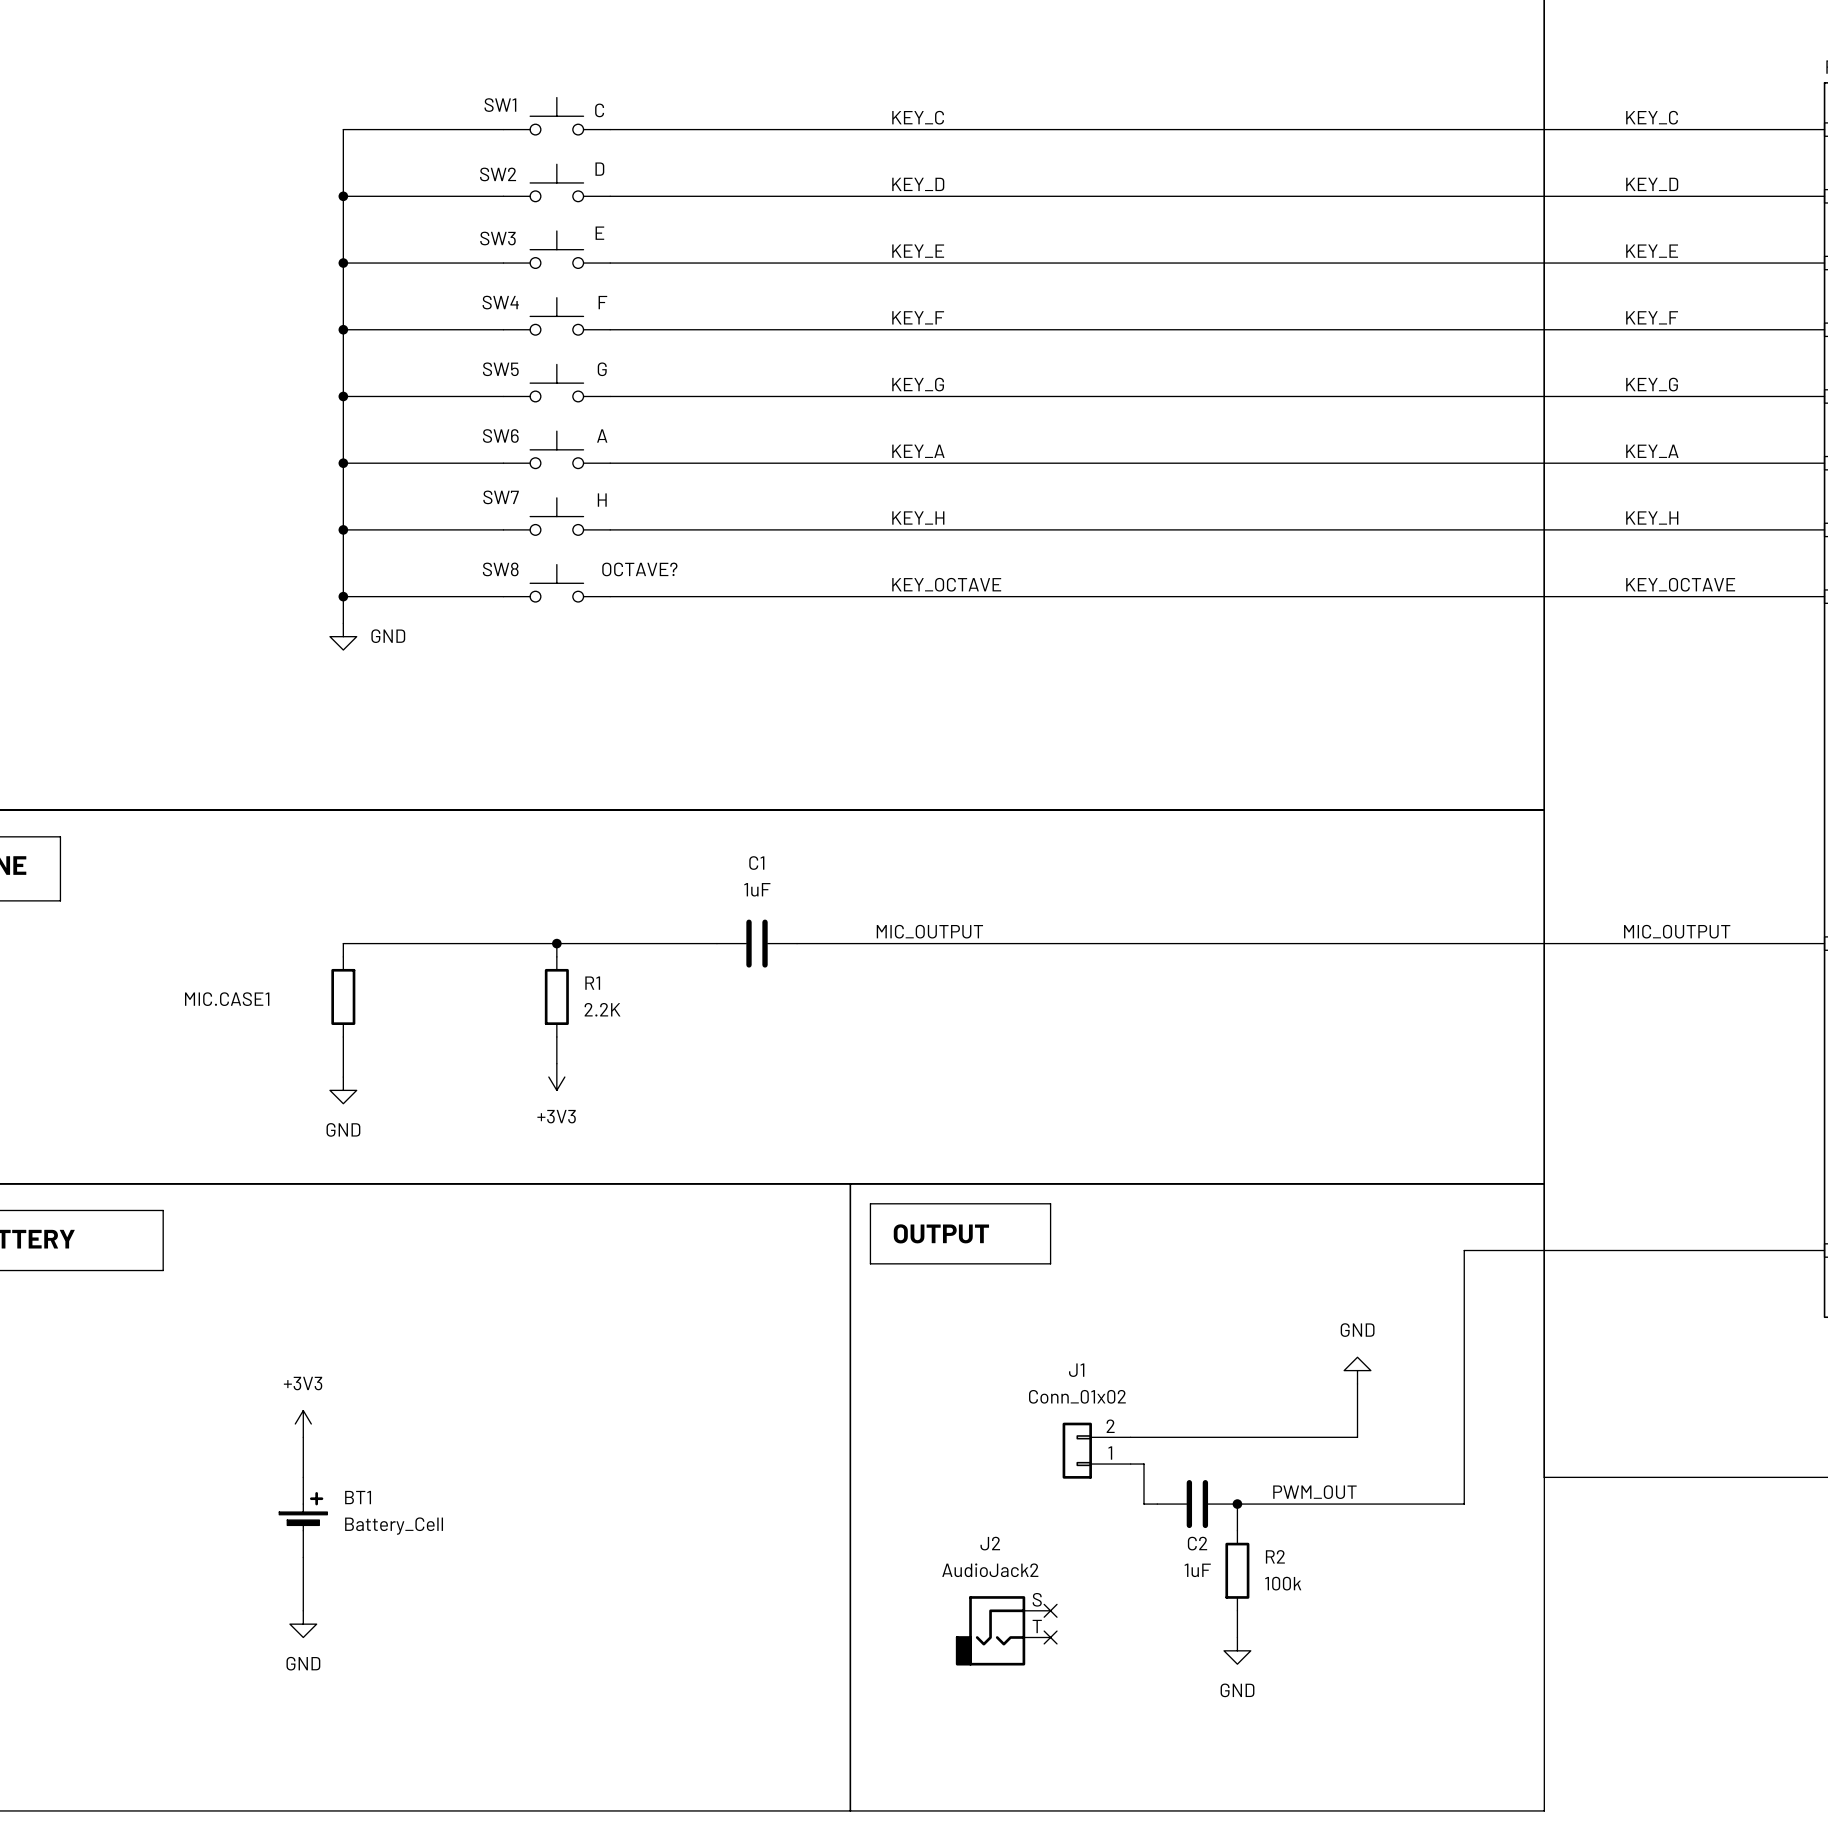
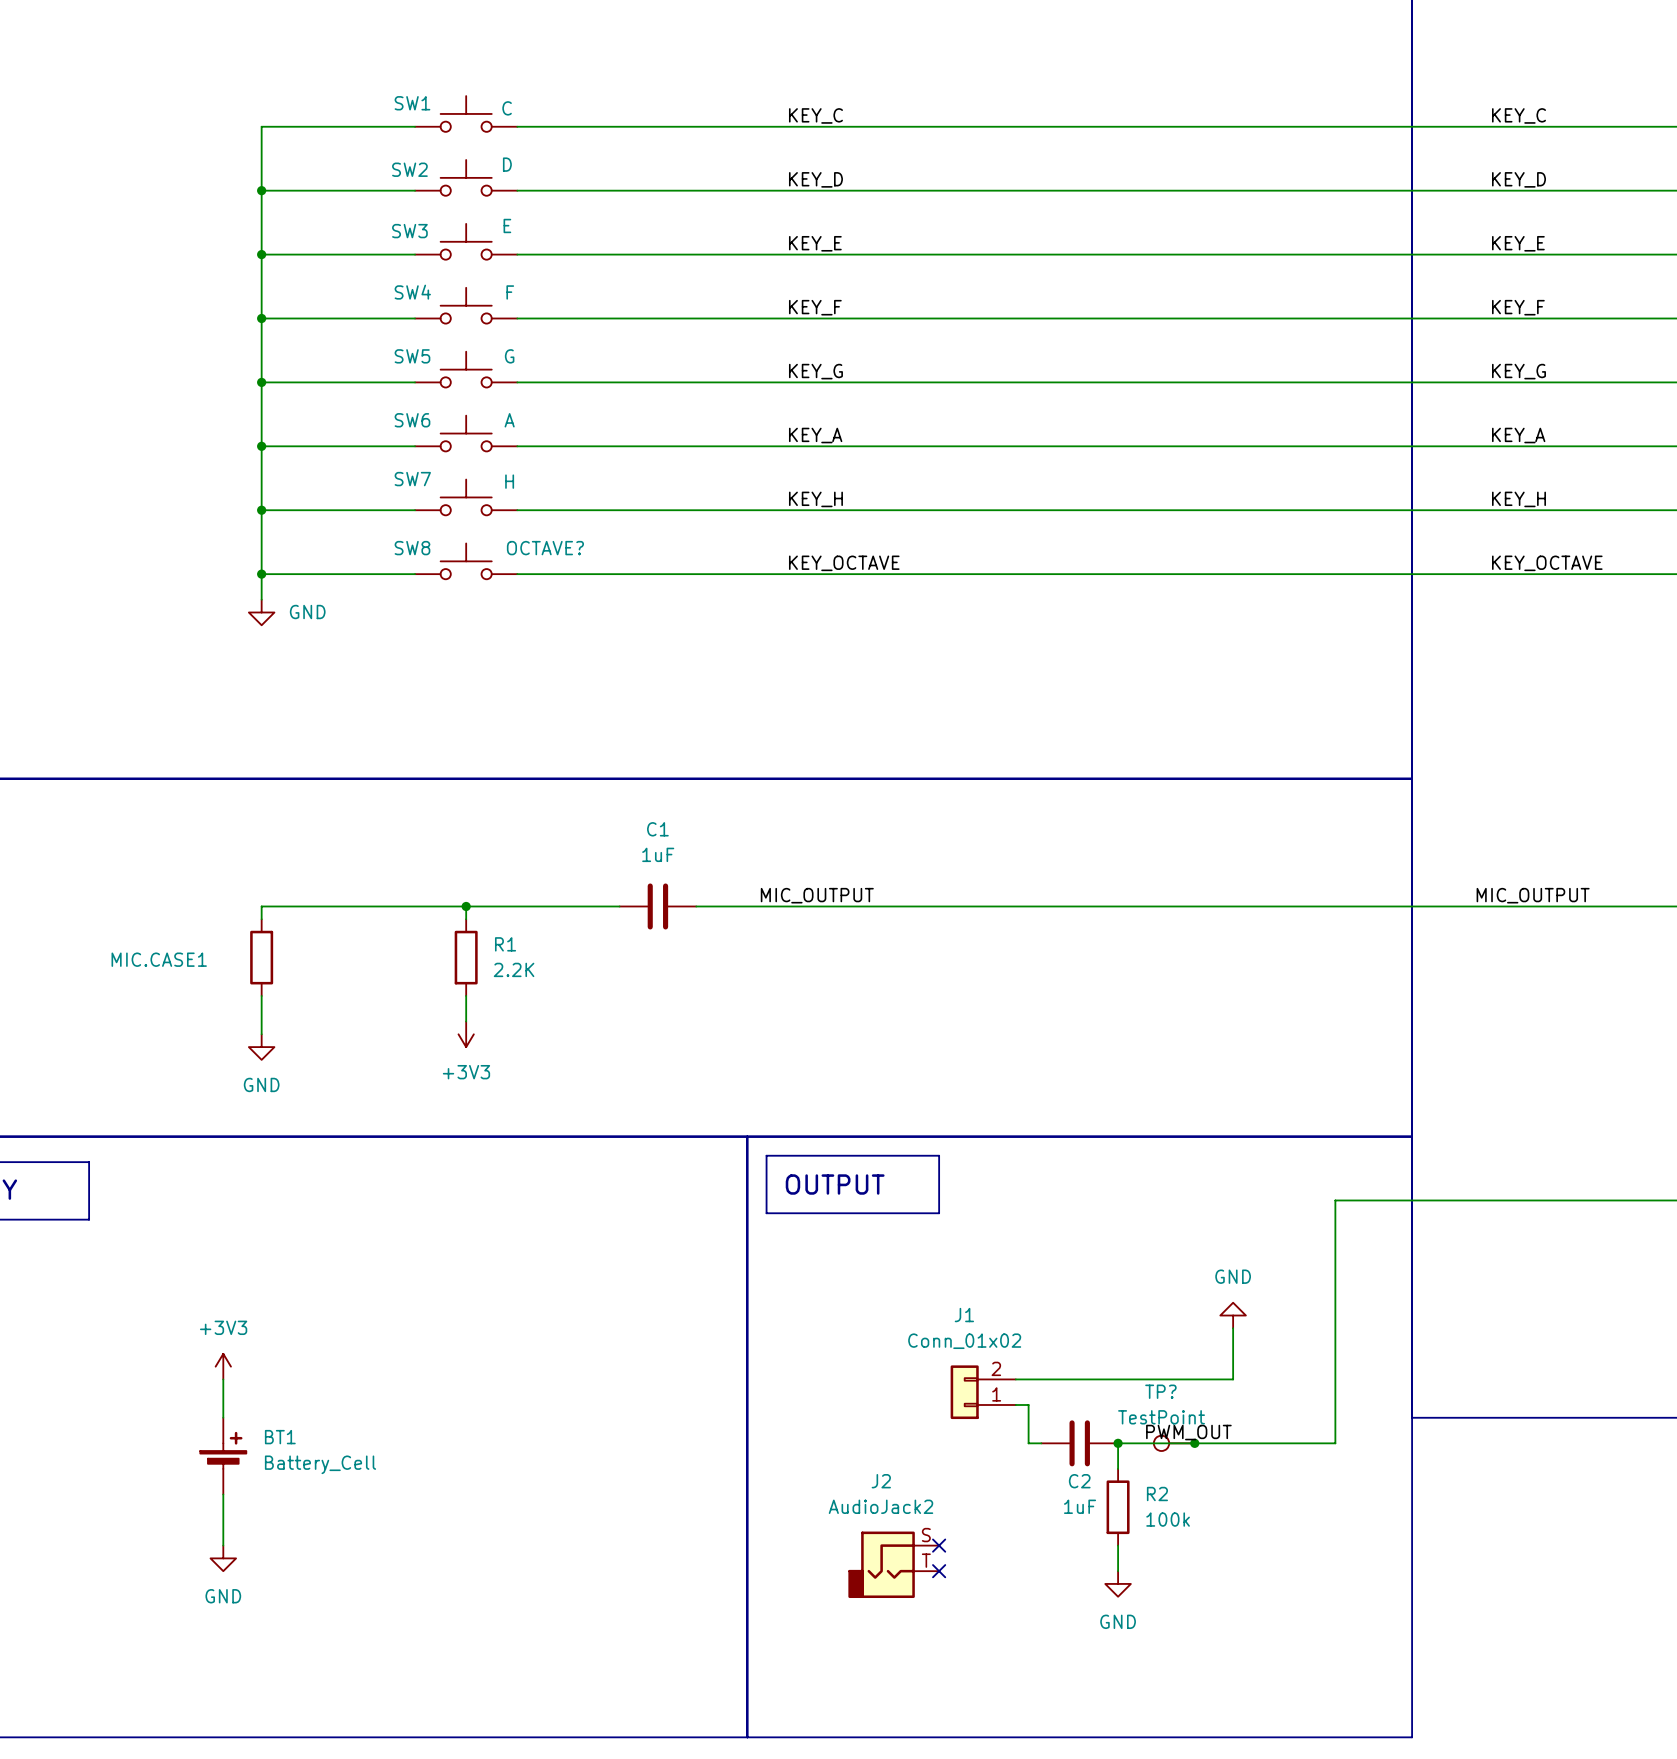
TP?: none -> TestPoint (1174, 1443)
junction: none -> (1194, 1443)

